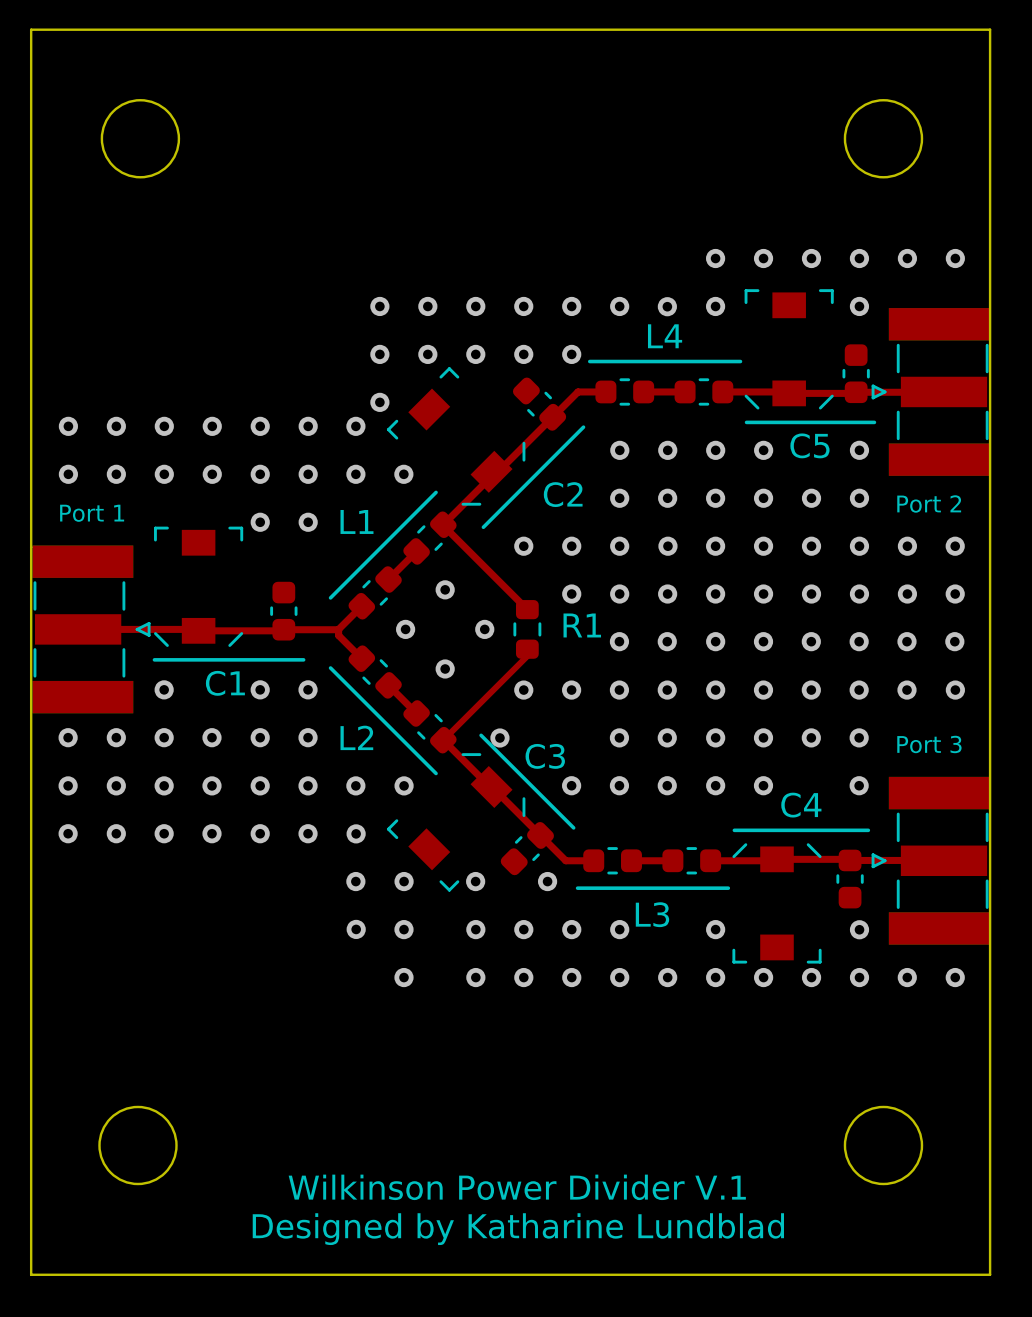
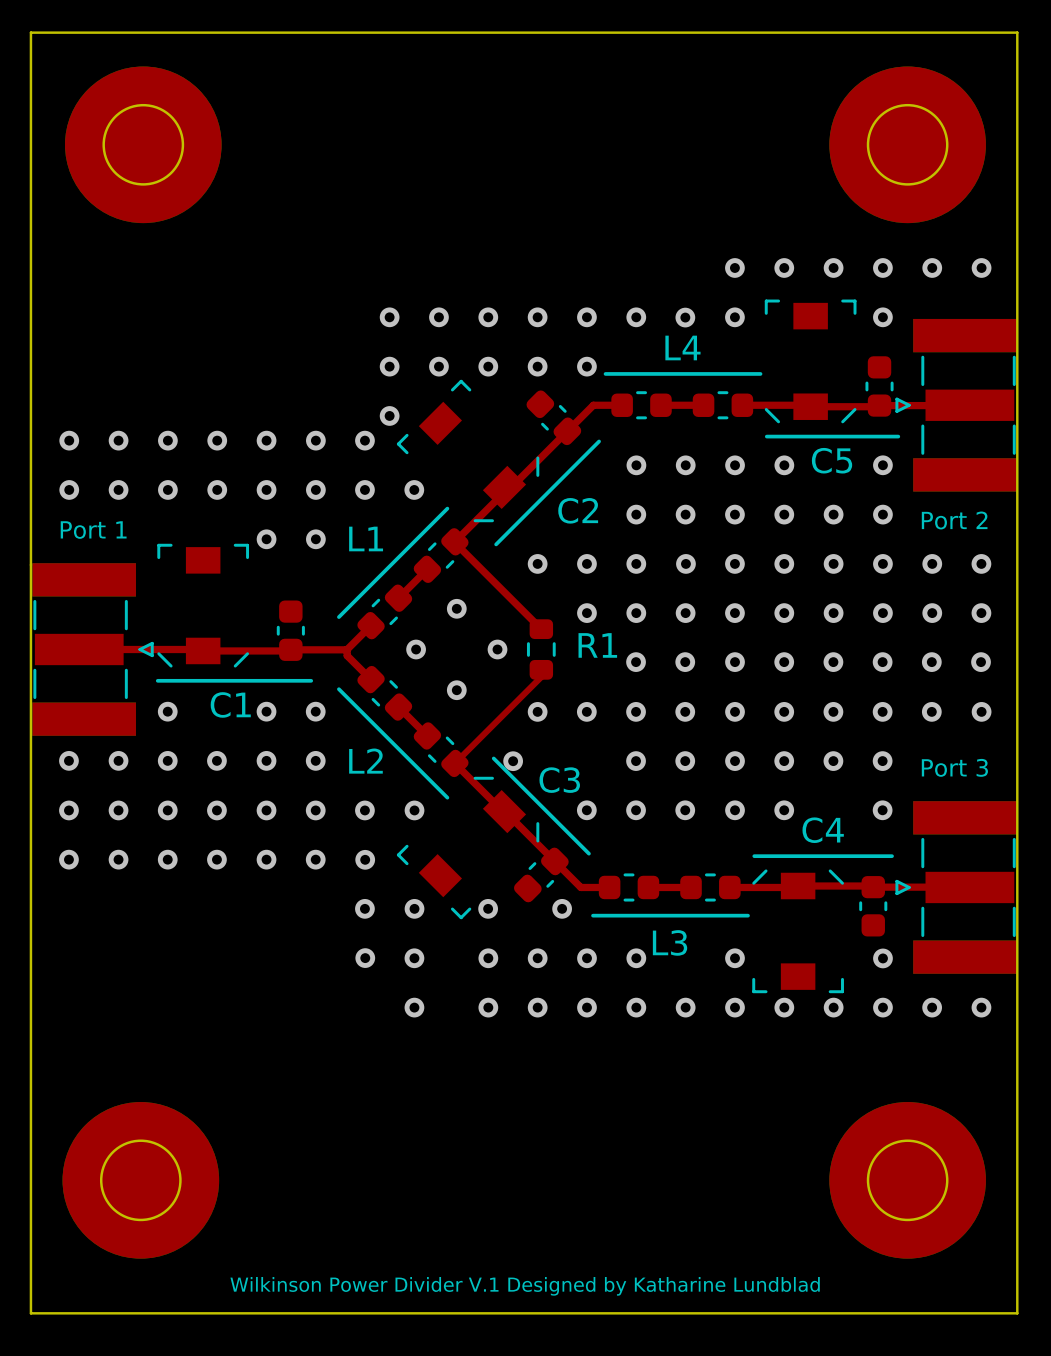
drawing: none -> [65, 66, 222, 224]
drawing: none -> [829, 66, 986, 224]
drawing: none -> [62, 1102, 220, 1259]
drawing: none -> [829, 1102, 986, 1259]
text: Wilkinson Power Divider V.1 (517, 1187) -> none
text: Designed by Katharine Lundblad (518, 1229) -> Wilkinson Power Divider V.1 Designed by Katharine Lundblad (525, 1286)

